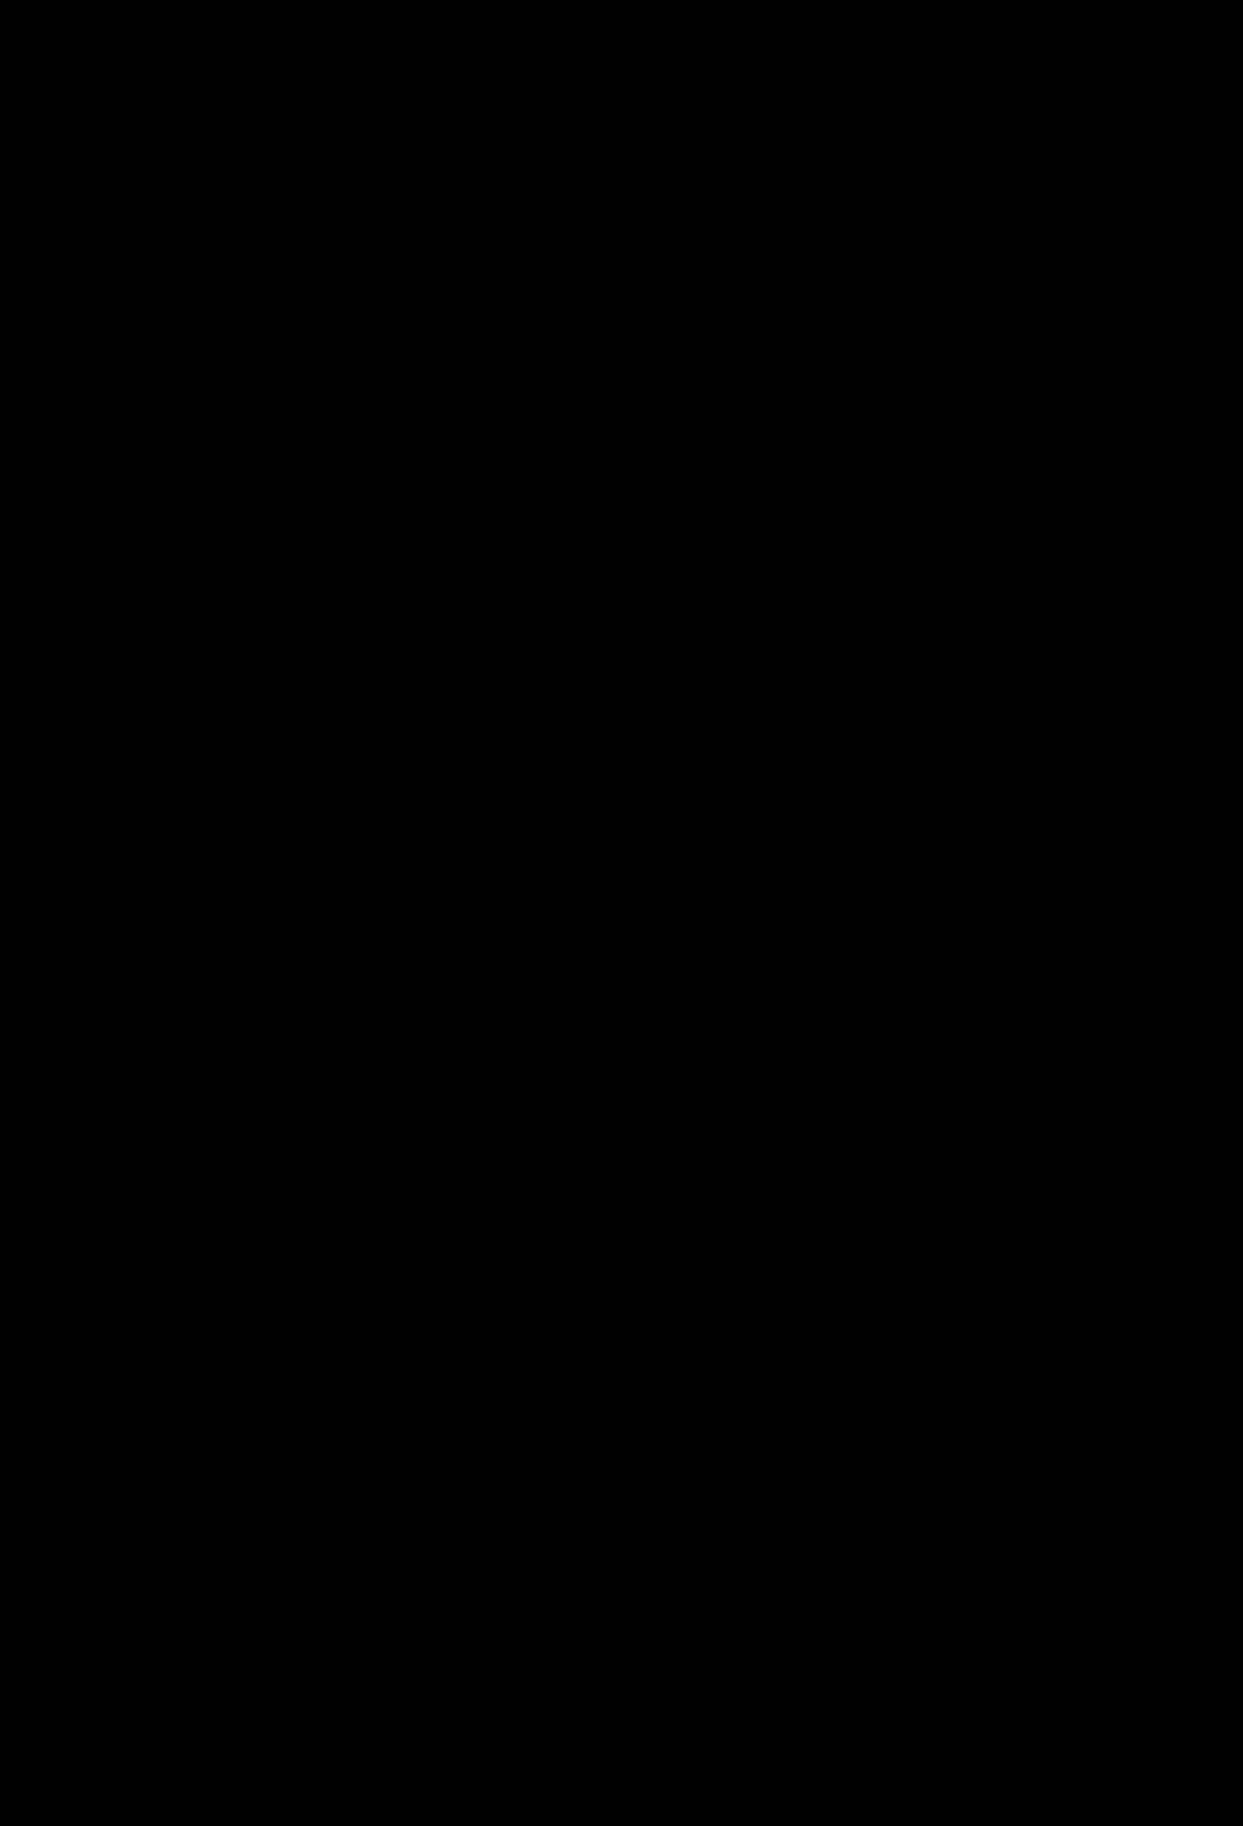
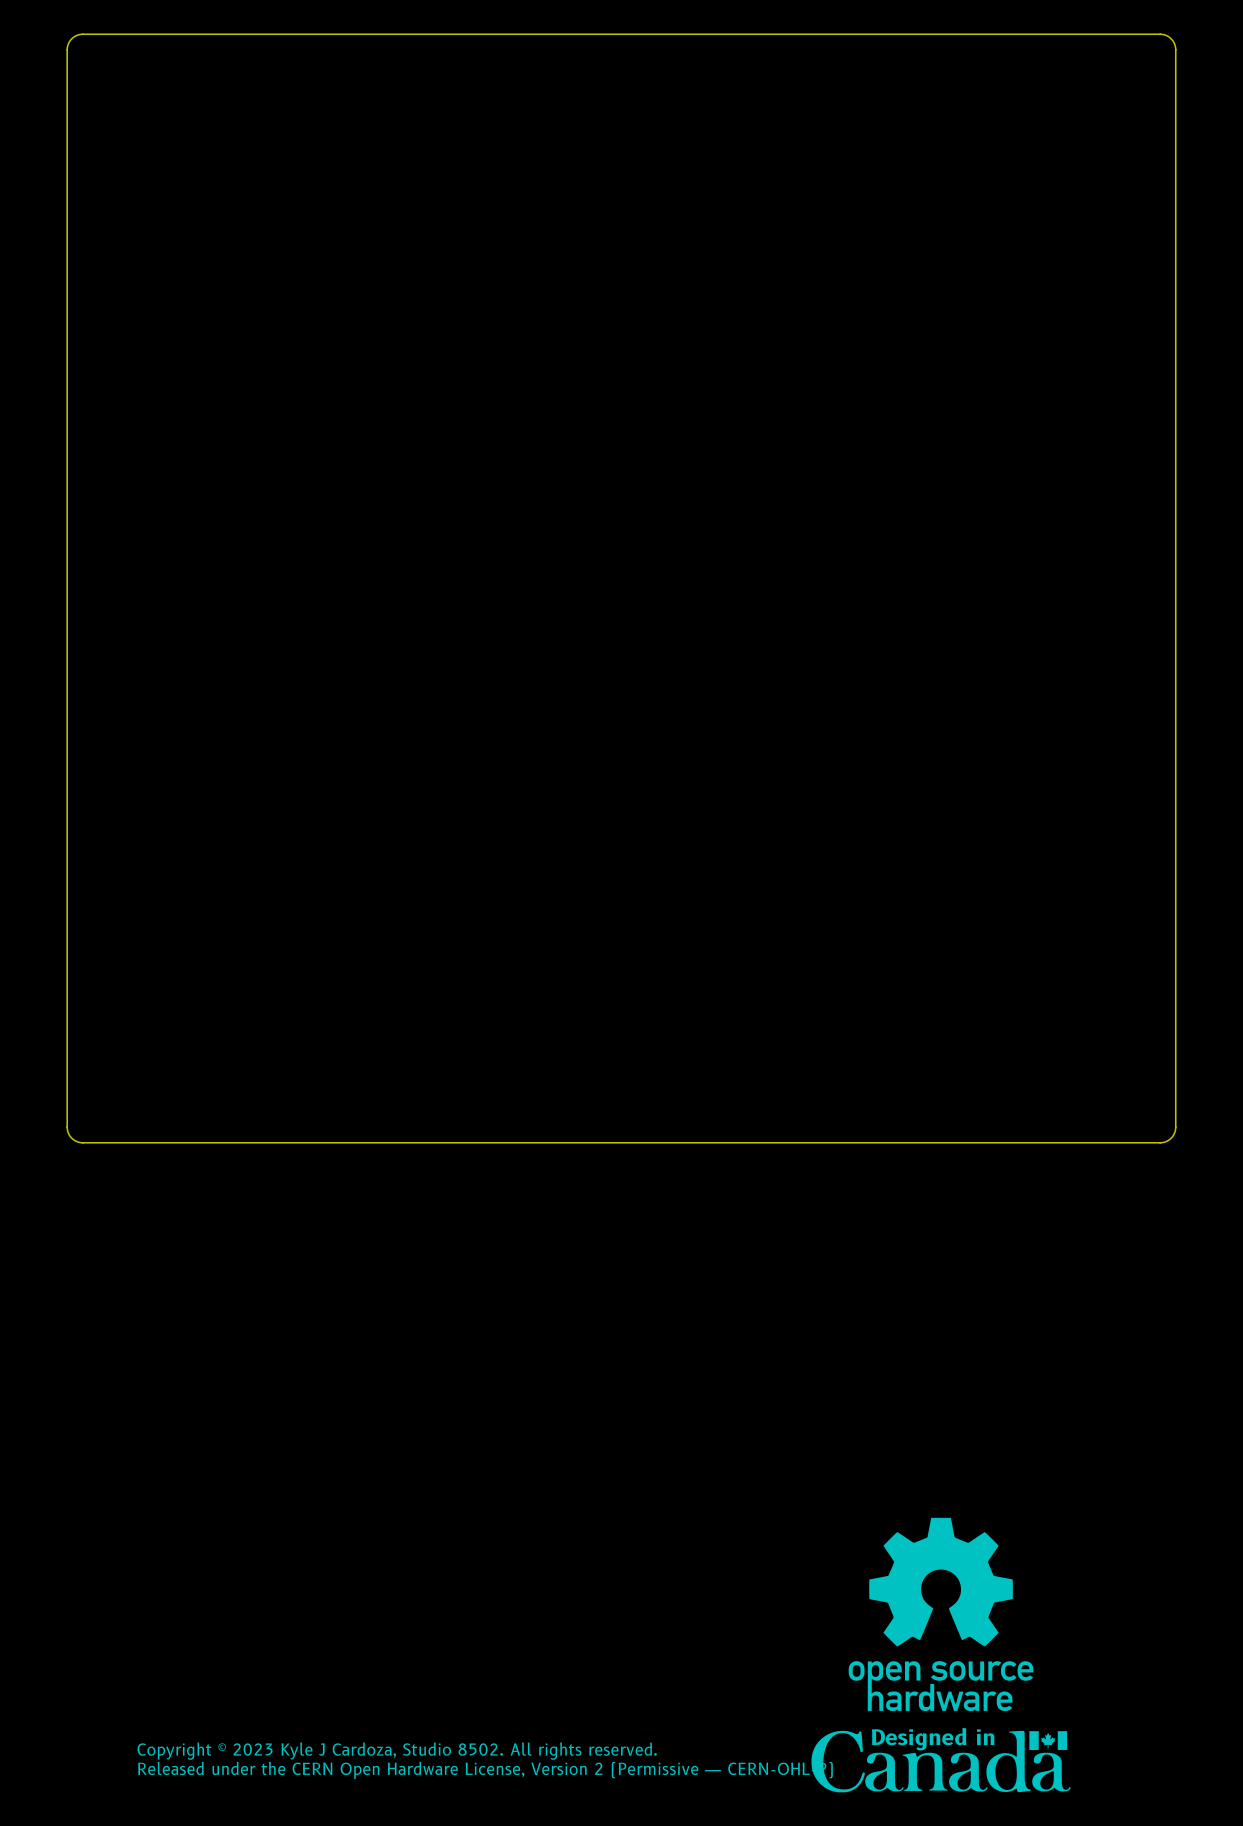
board edge: none -> (82, 34) (1160, 34) (1171, 38) (1175, 49) (1175, 1127) (1171, 1138) (1160, 1142) (82, 1142) (71, 1138) (67, 1127) (67, 49) (71, 38) (82, 34)
drawing: none -> [848, 1517, 1034, 1712]
drawing: none -> [811, 1730, 1071, 1793]
text: none -> Designed in (933, 1739)
text: none -> Copyright © 2023 Kyle J Cardoza, Studio 8502. All rights reserved. (397, 1751)
text: none -> Released under the CERN Open Hardware License, Version 2 (Permissive — CERN-OHL-P) (485, 1770)

